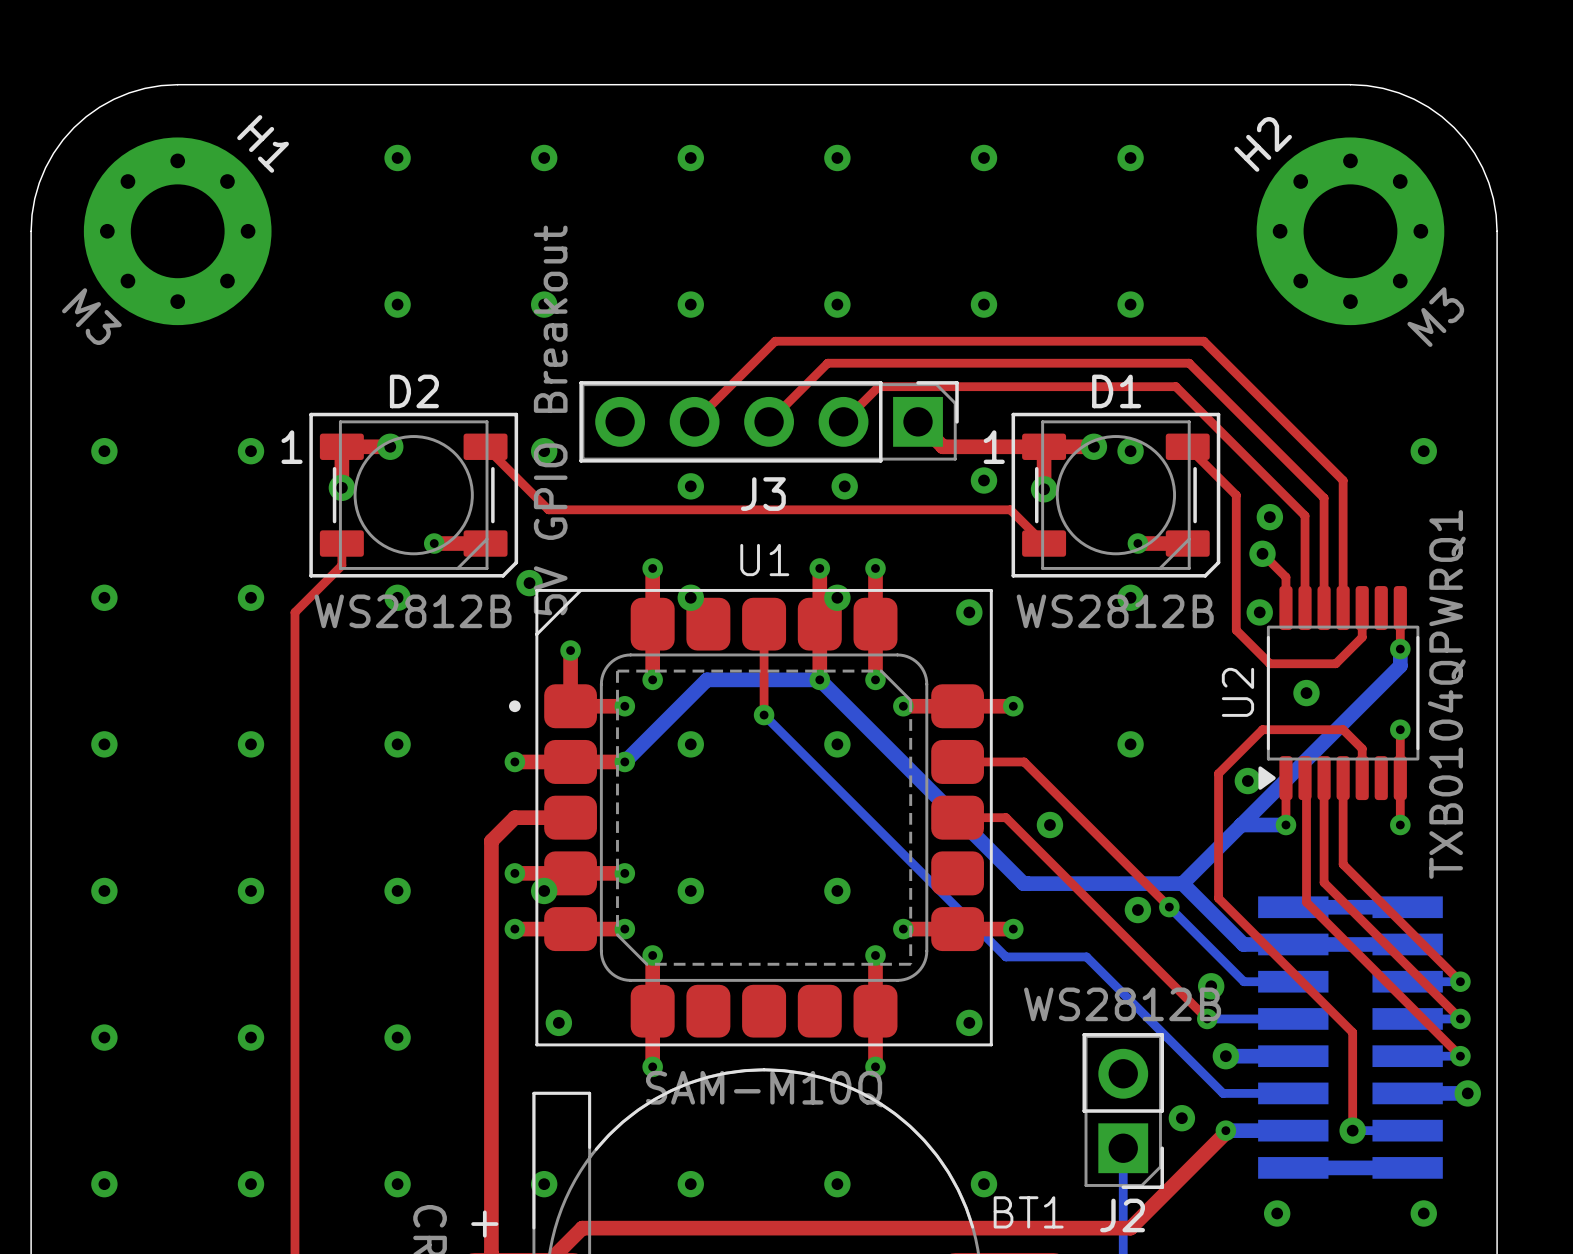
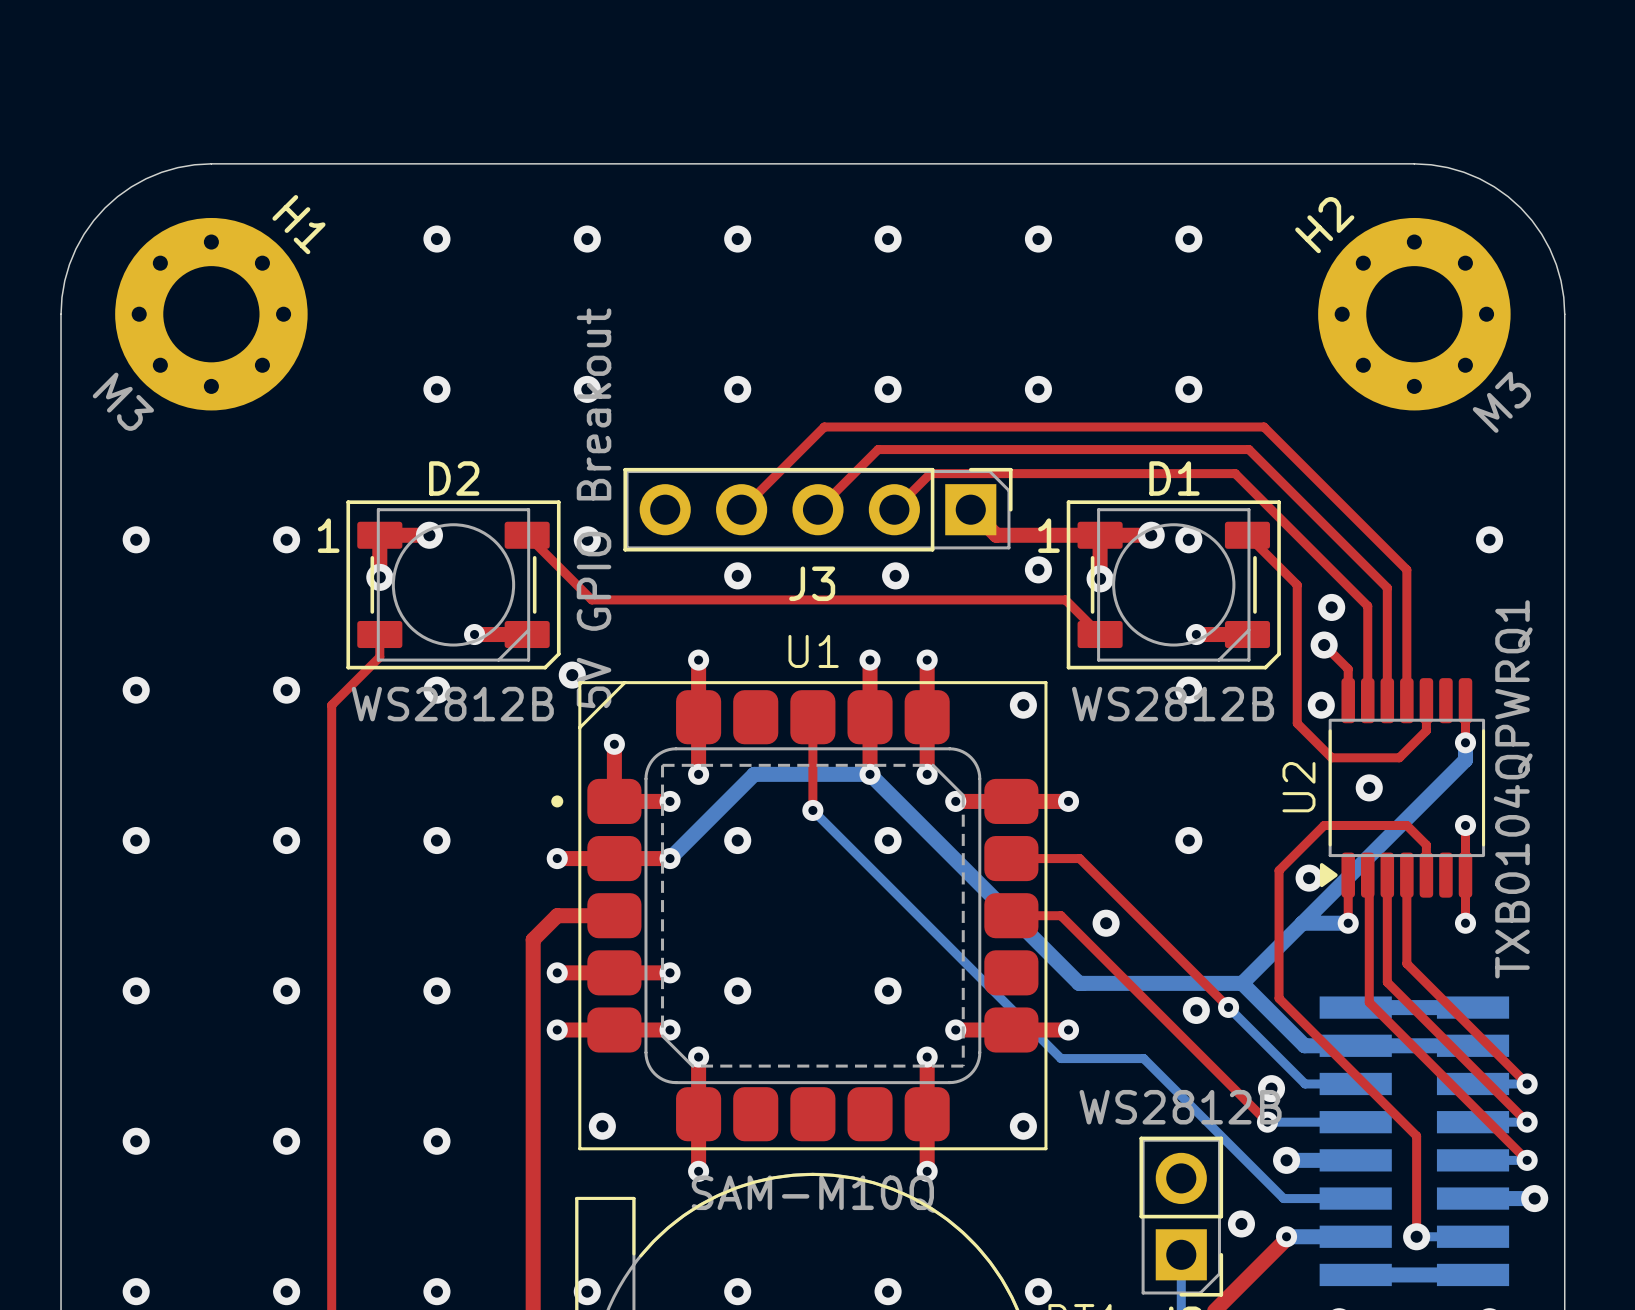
via: (690, 597) -> none
via: (837, 597) -> none
via: (544, 890) -> none

